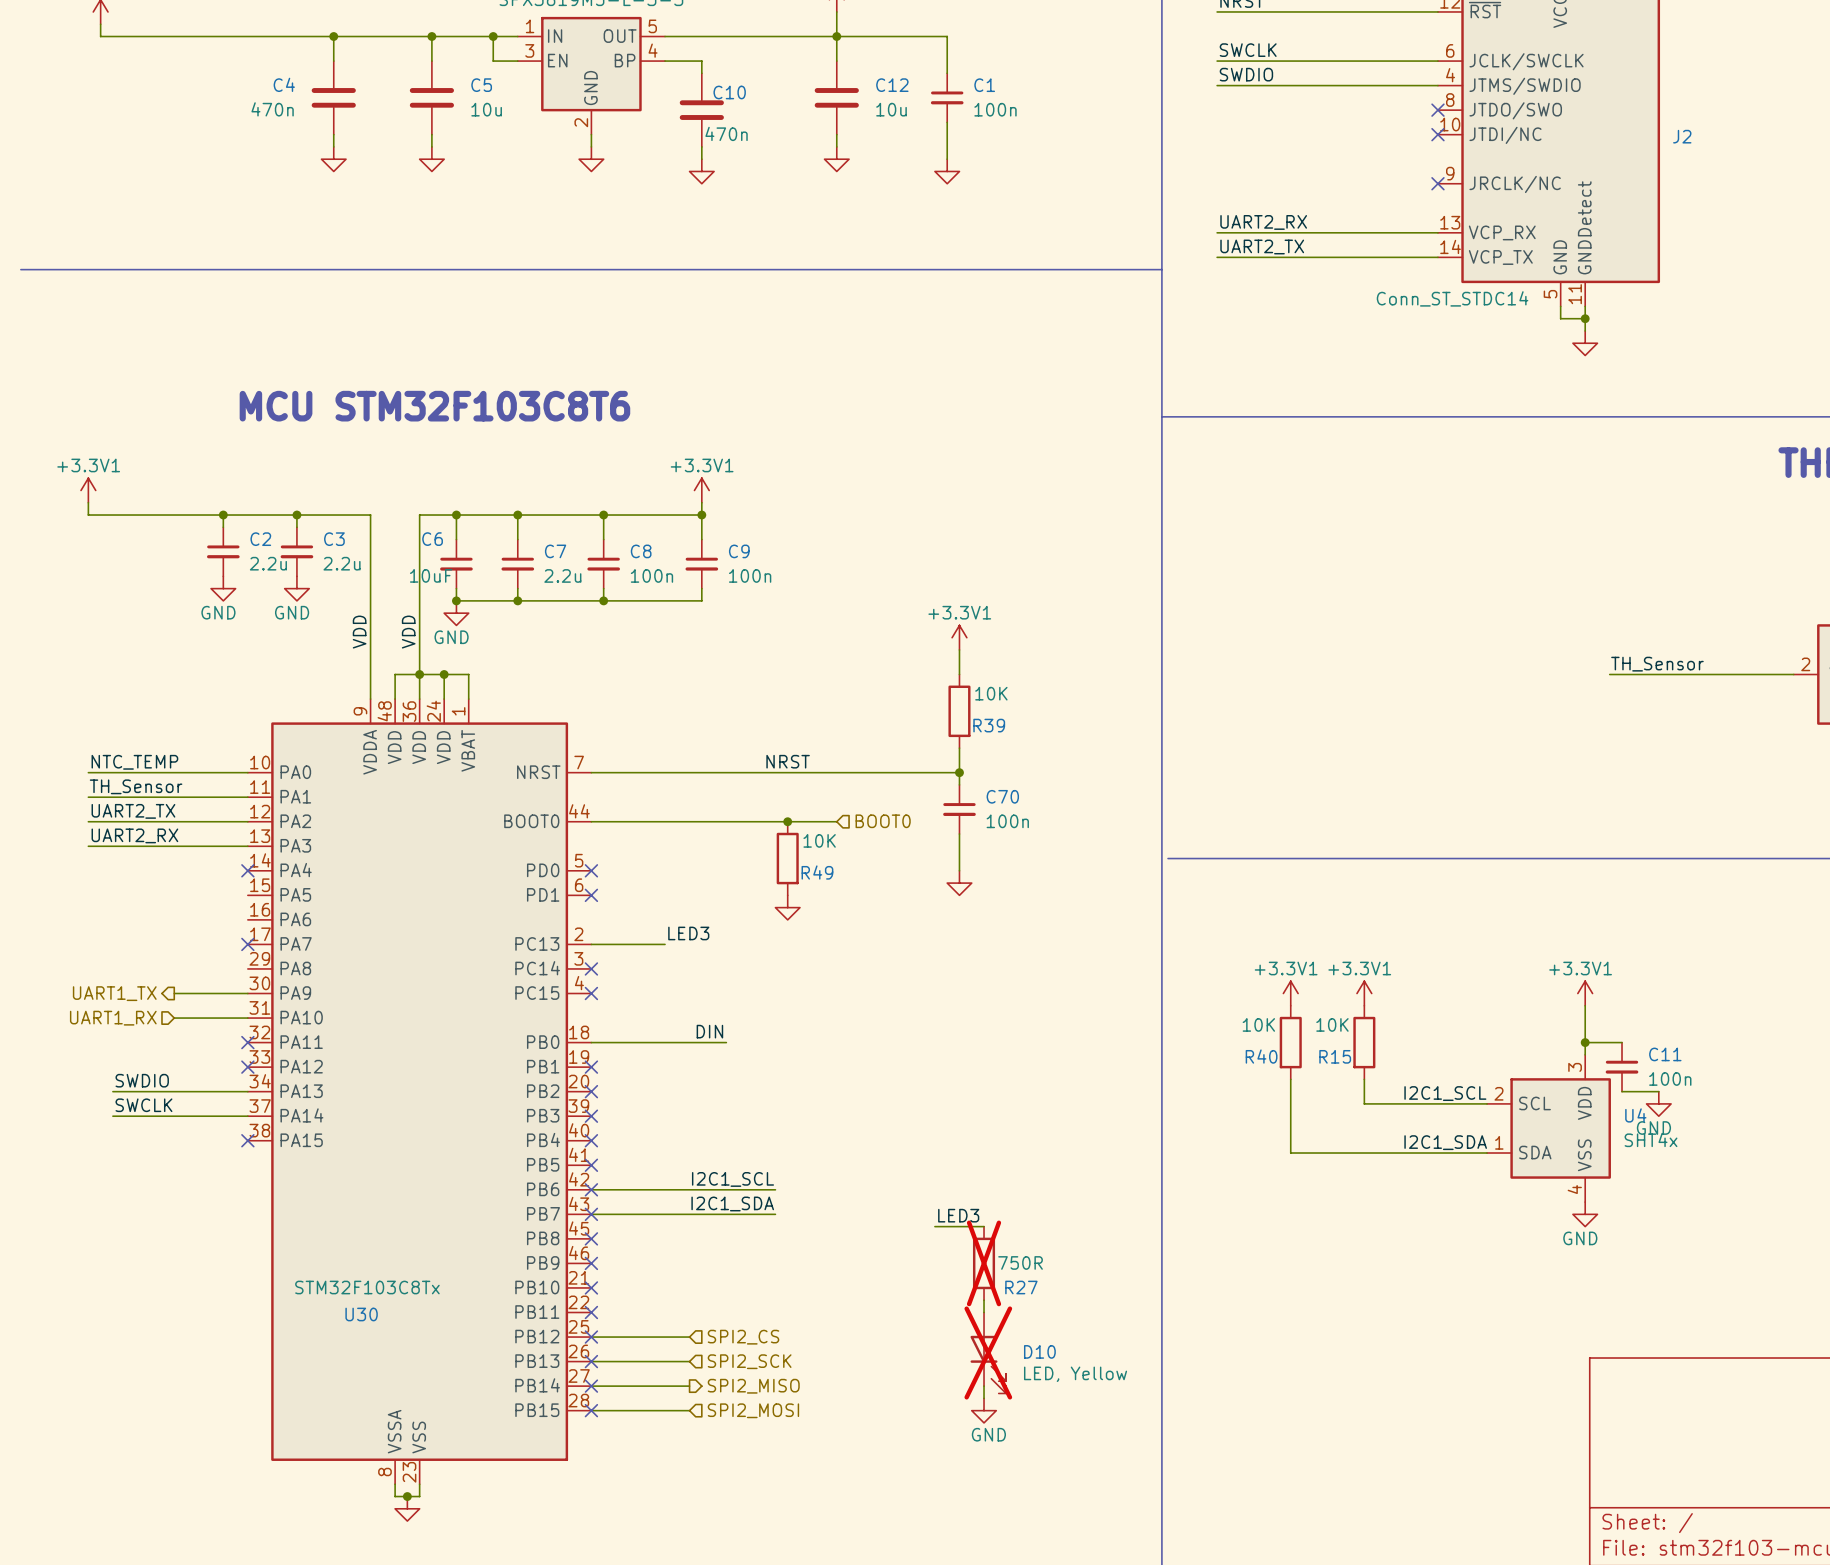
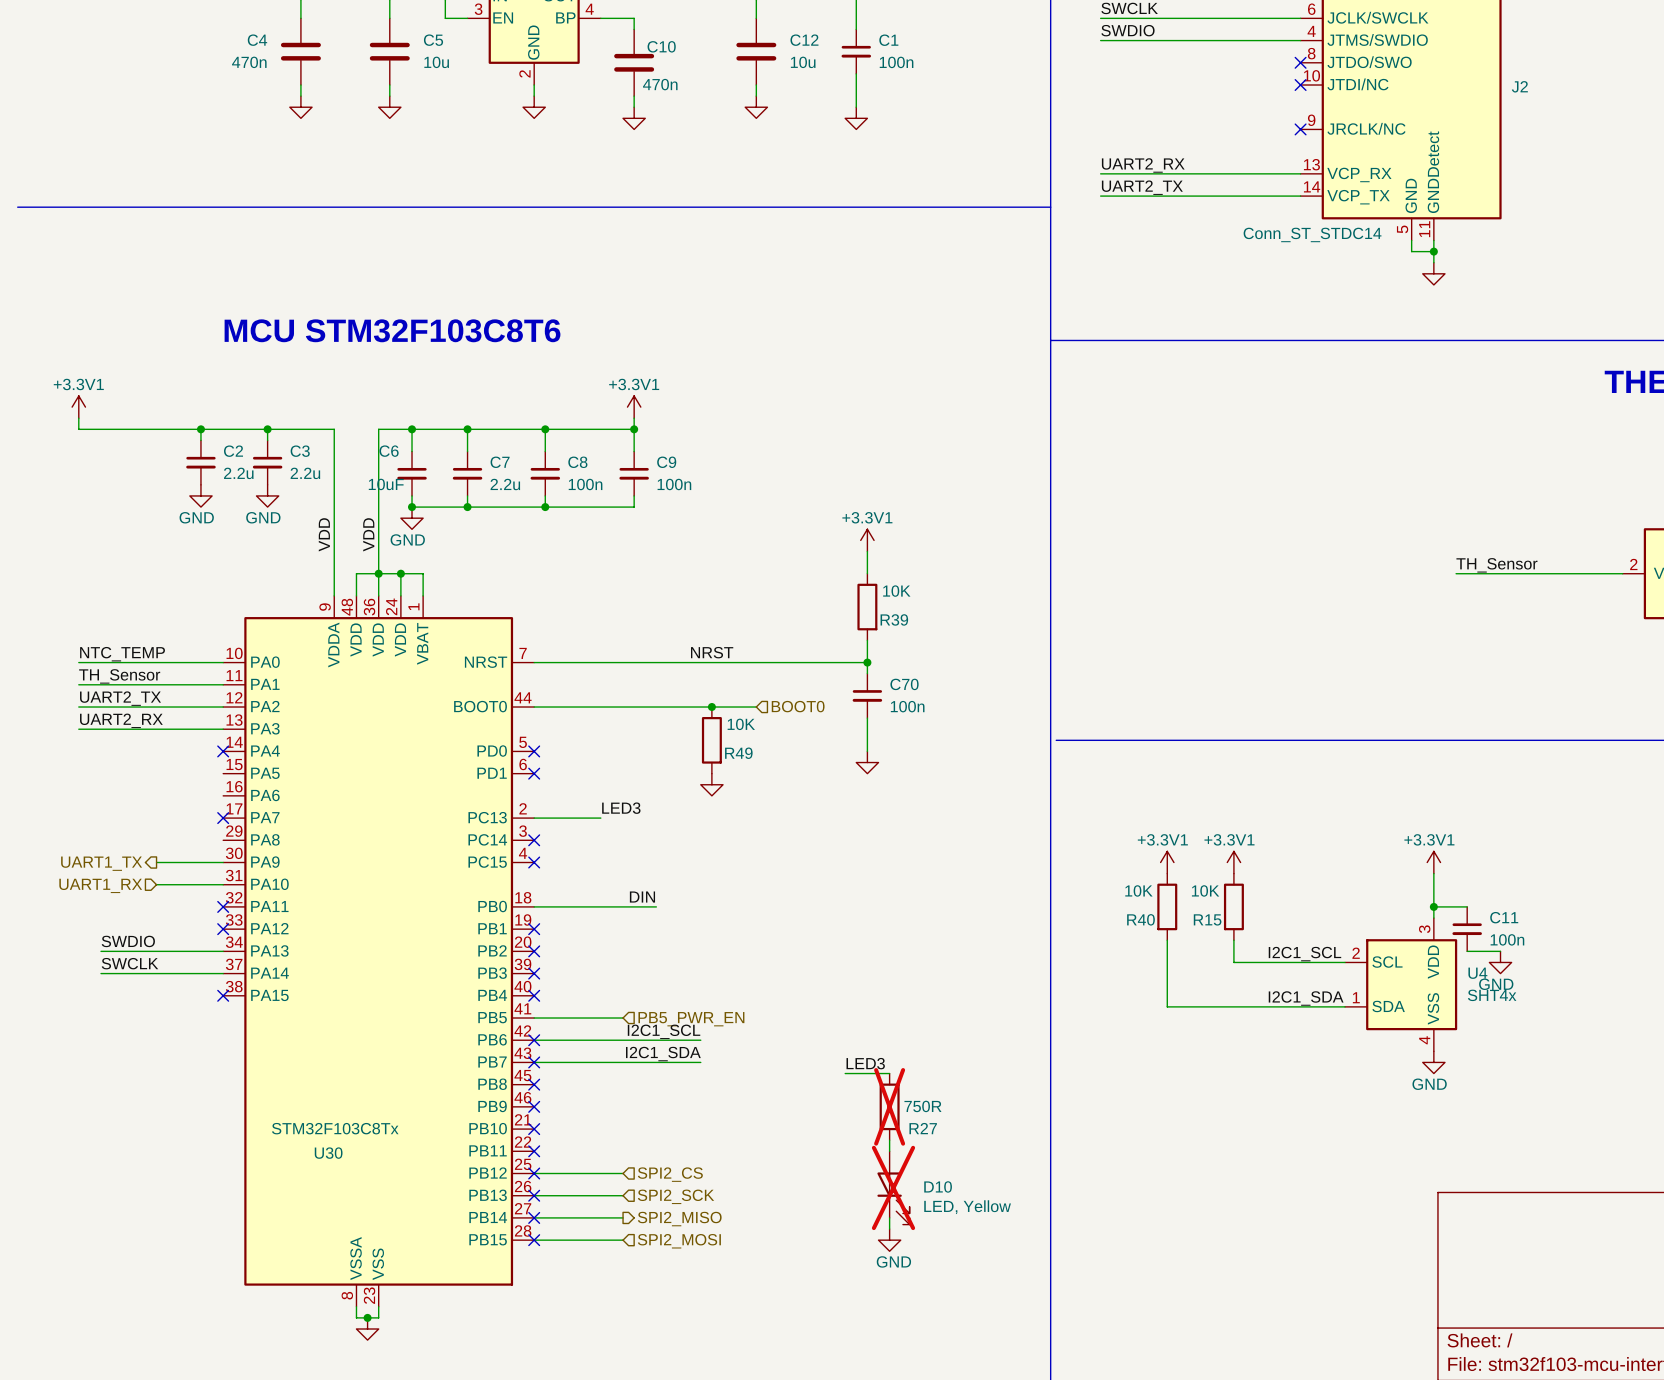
wire: none -> (534, 1018) (623, 1018)
no-connect mark: (591, 1165) -> none
hierarchical label: none -> PB5_PWR_EN (691, 1019)

